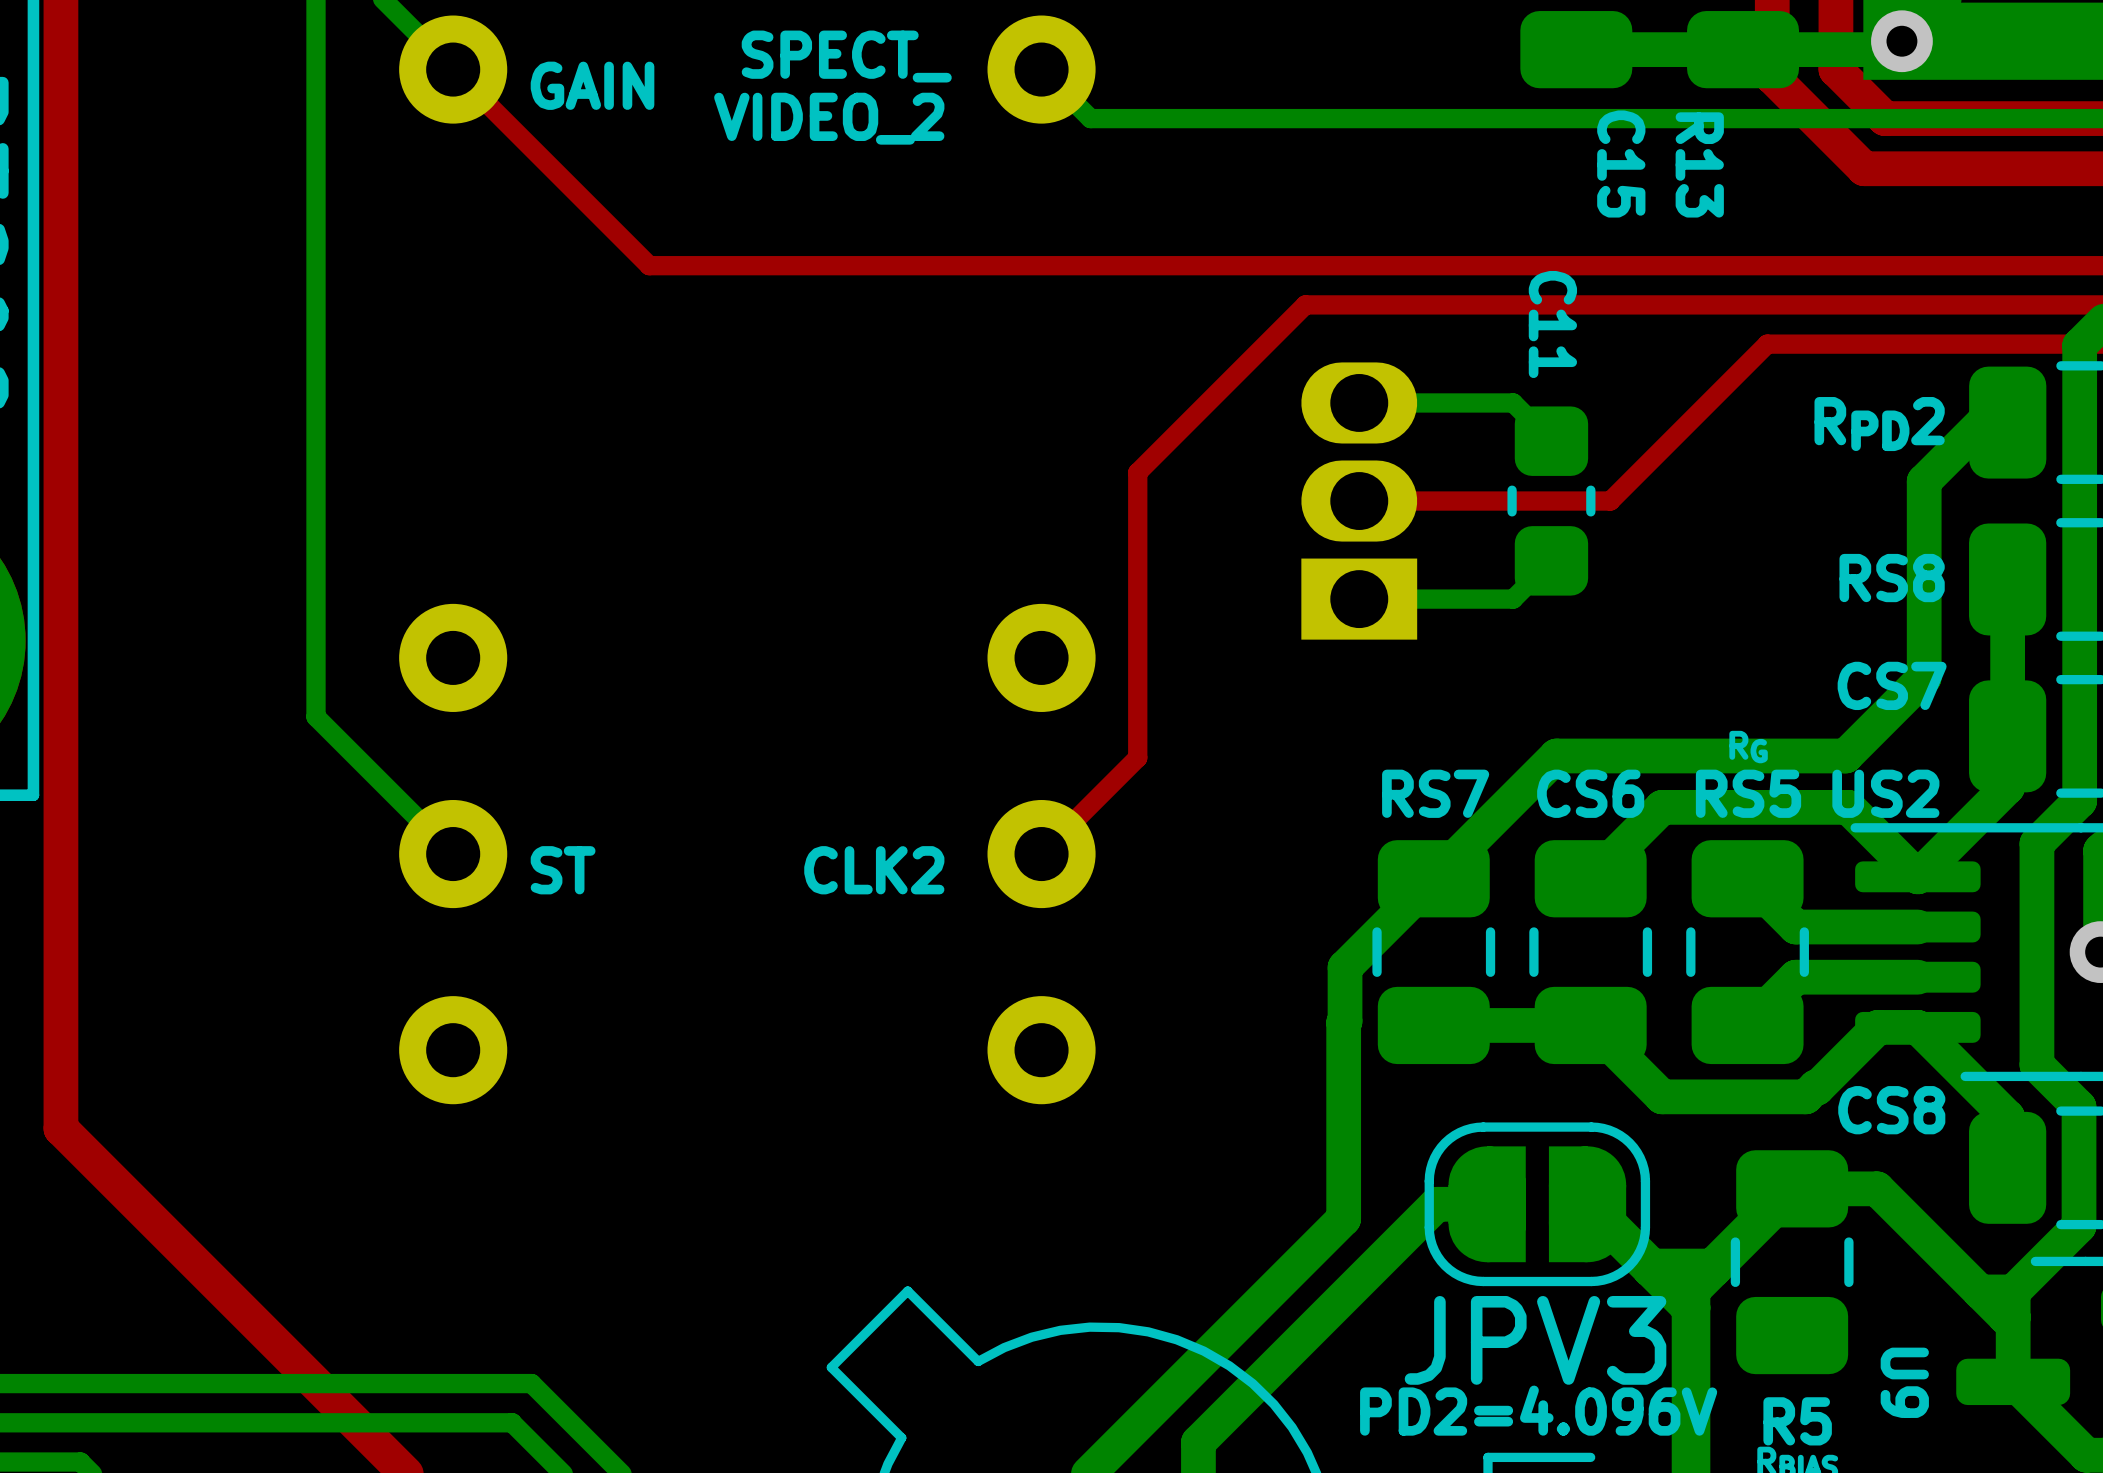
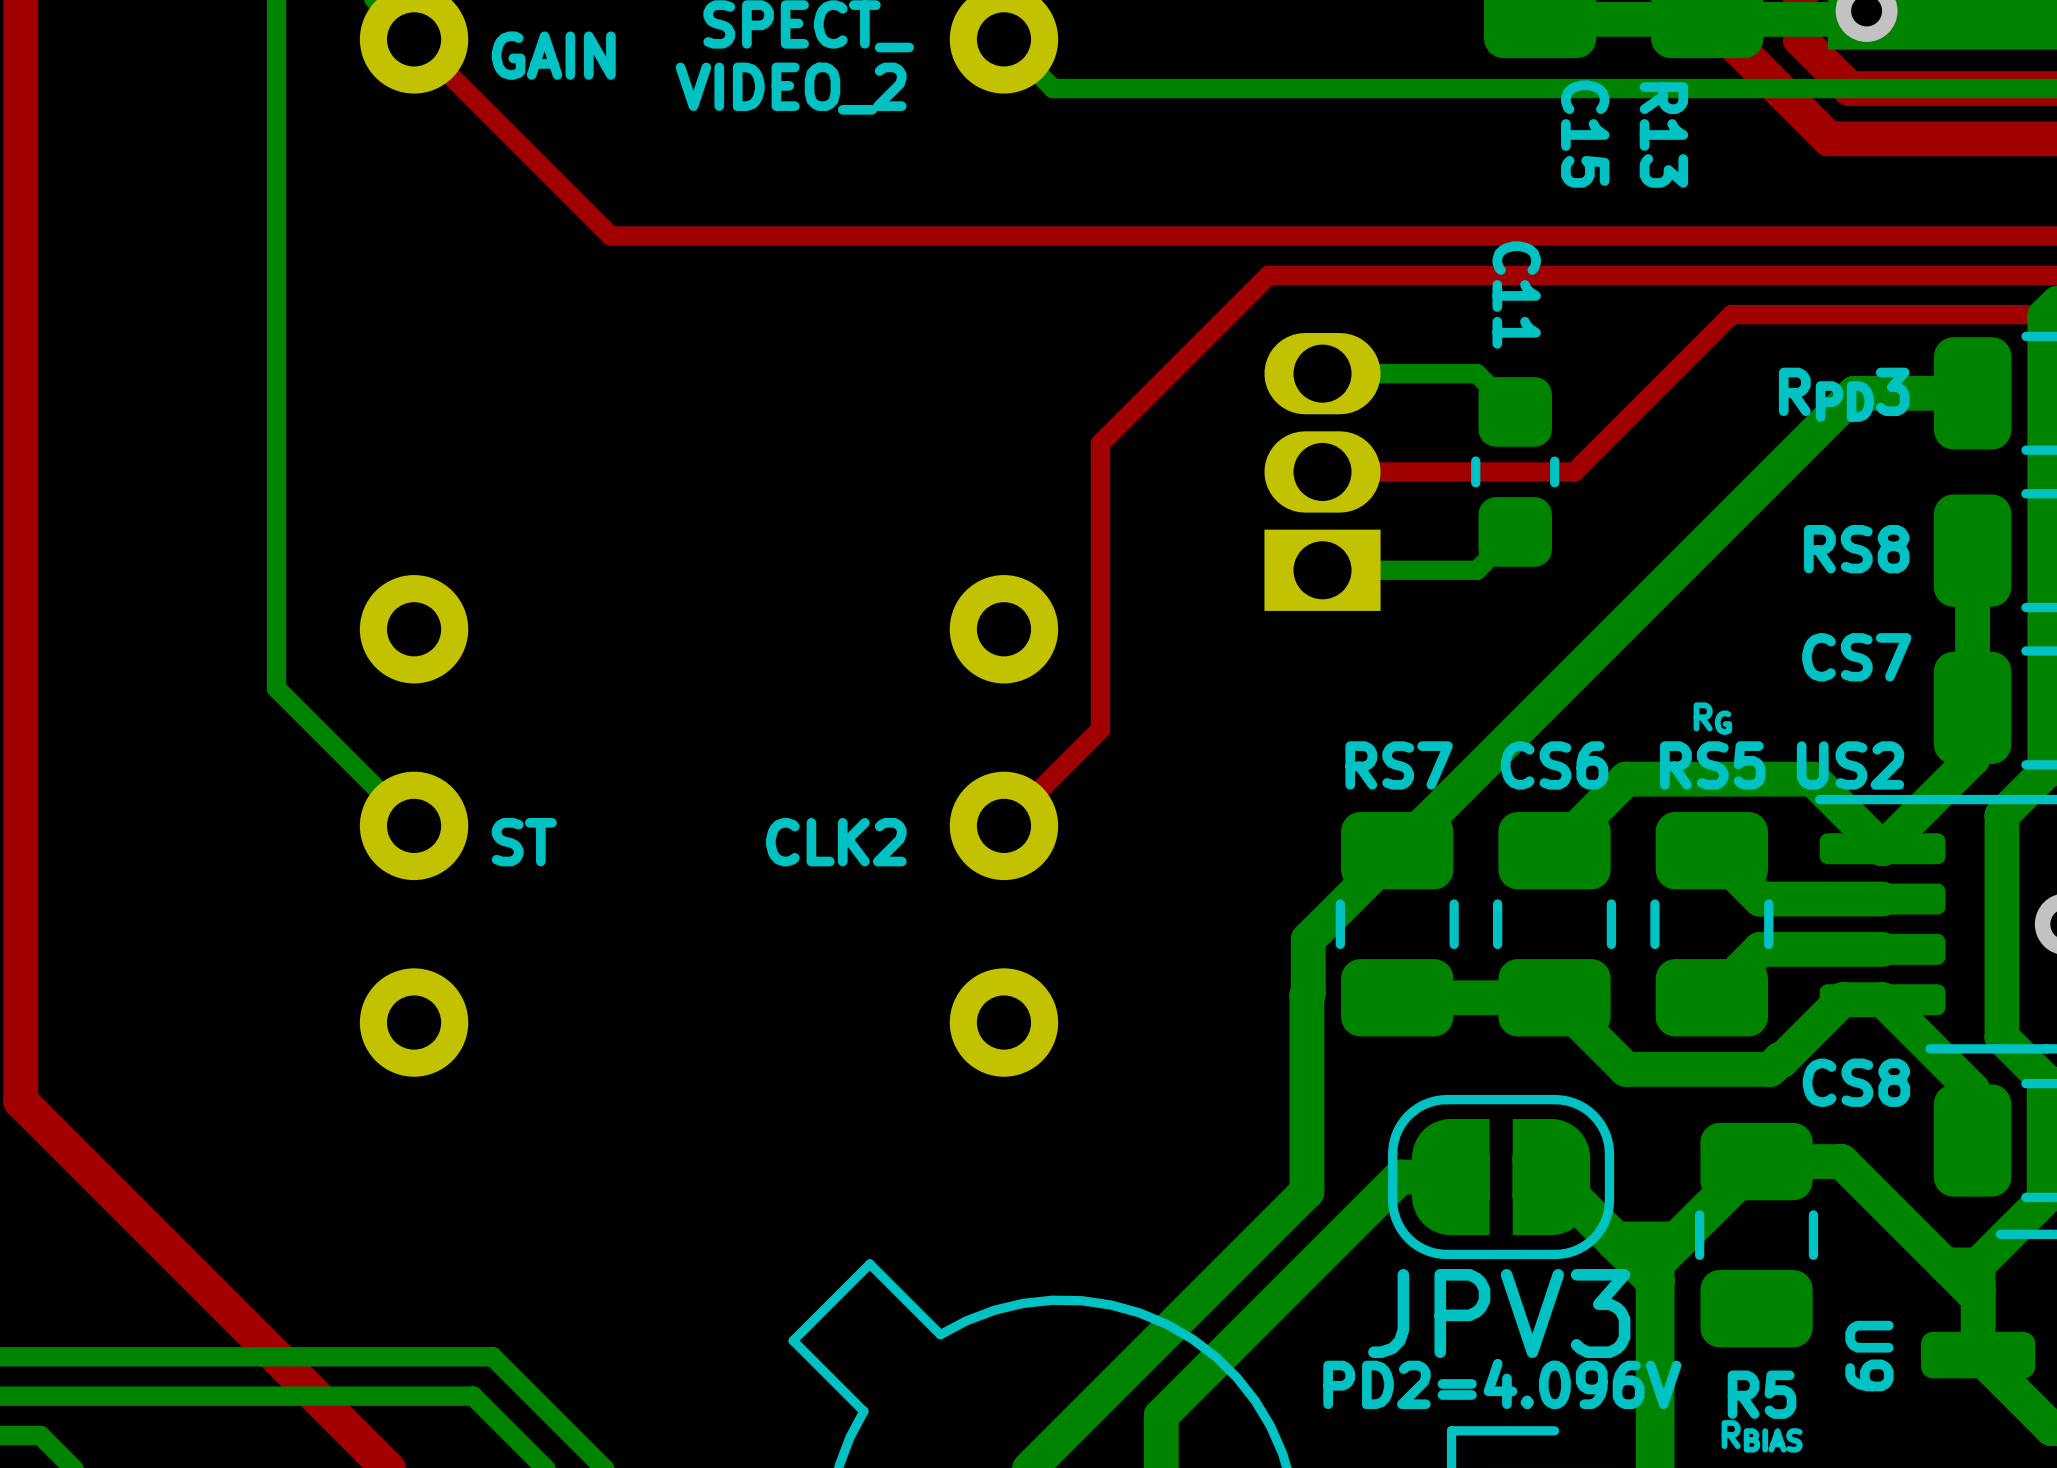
bottom track: (1983, 422) (1924, 481) (1924, 677) (1845, 755) (1556, 755) -> (1947, 393) (1854, 393) (1520, 727)
RPD2 name: RPD2 (1879, 424) -> RPD3 (1844, 394)

